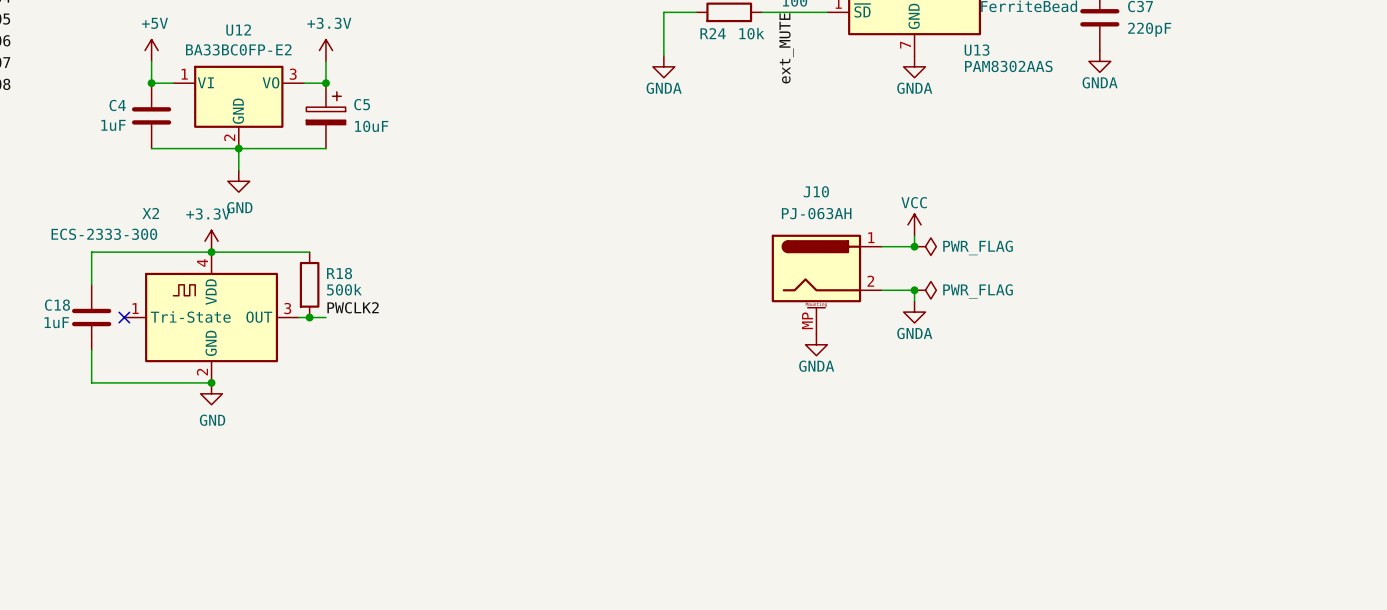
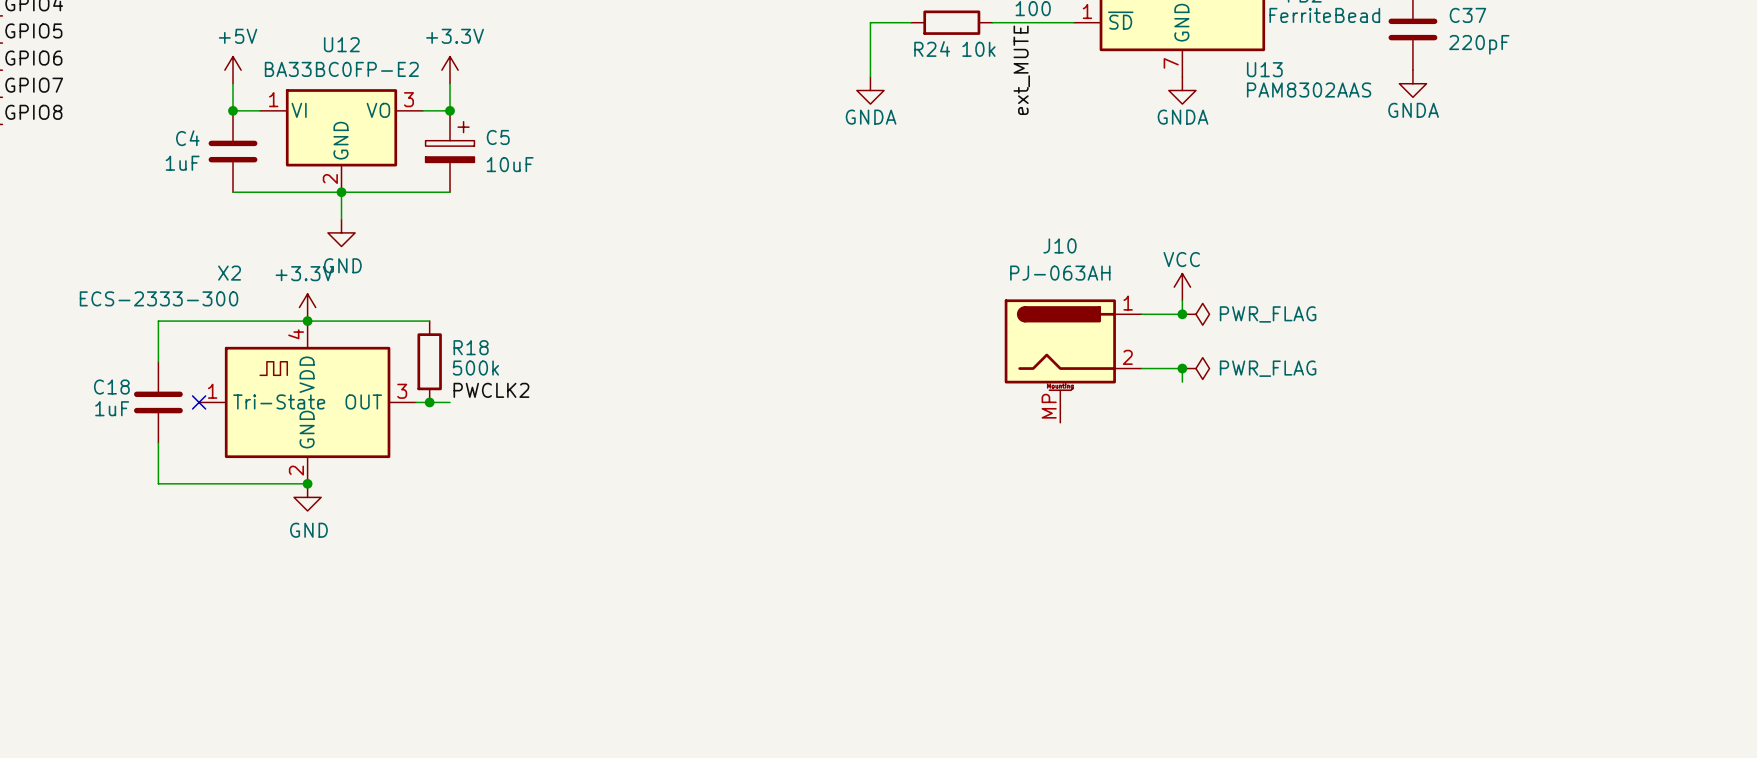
power symbol: GNDA (914, 312) -> none
power symbol: GNDA (816, 344) -> none

